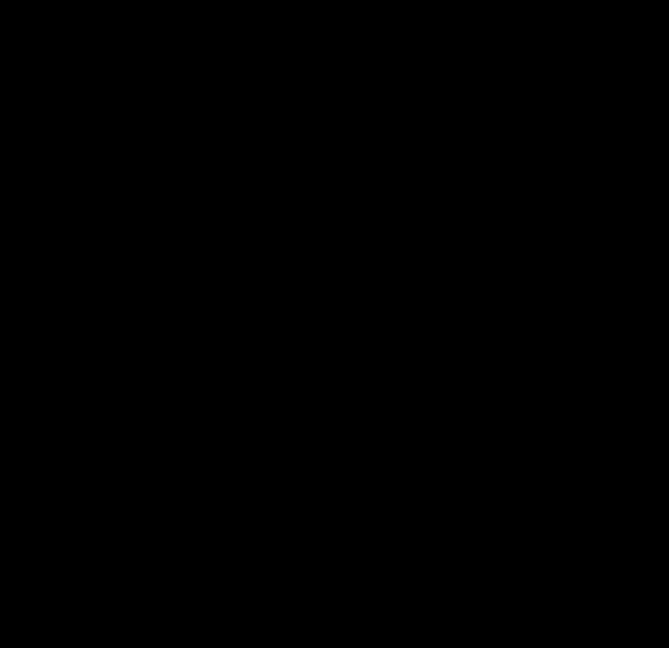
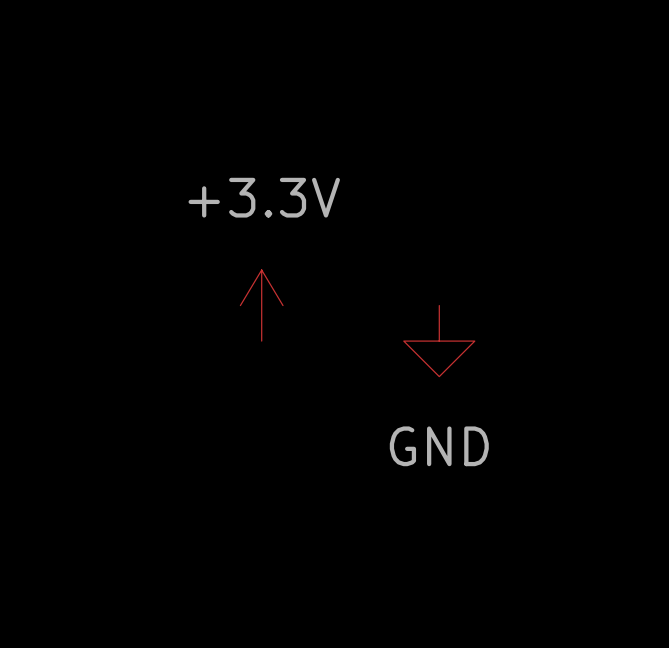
power symbol: none -> +3.3V (261, 305)
power symbol: none -> GND (439, 341)

